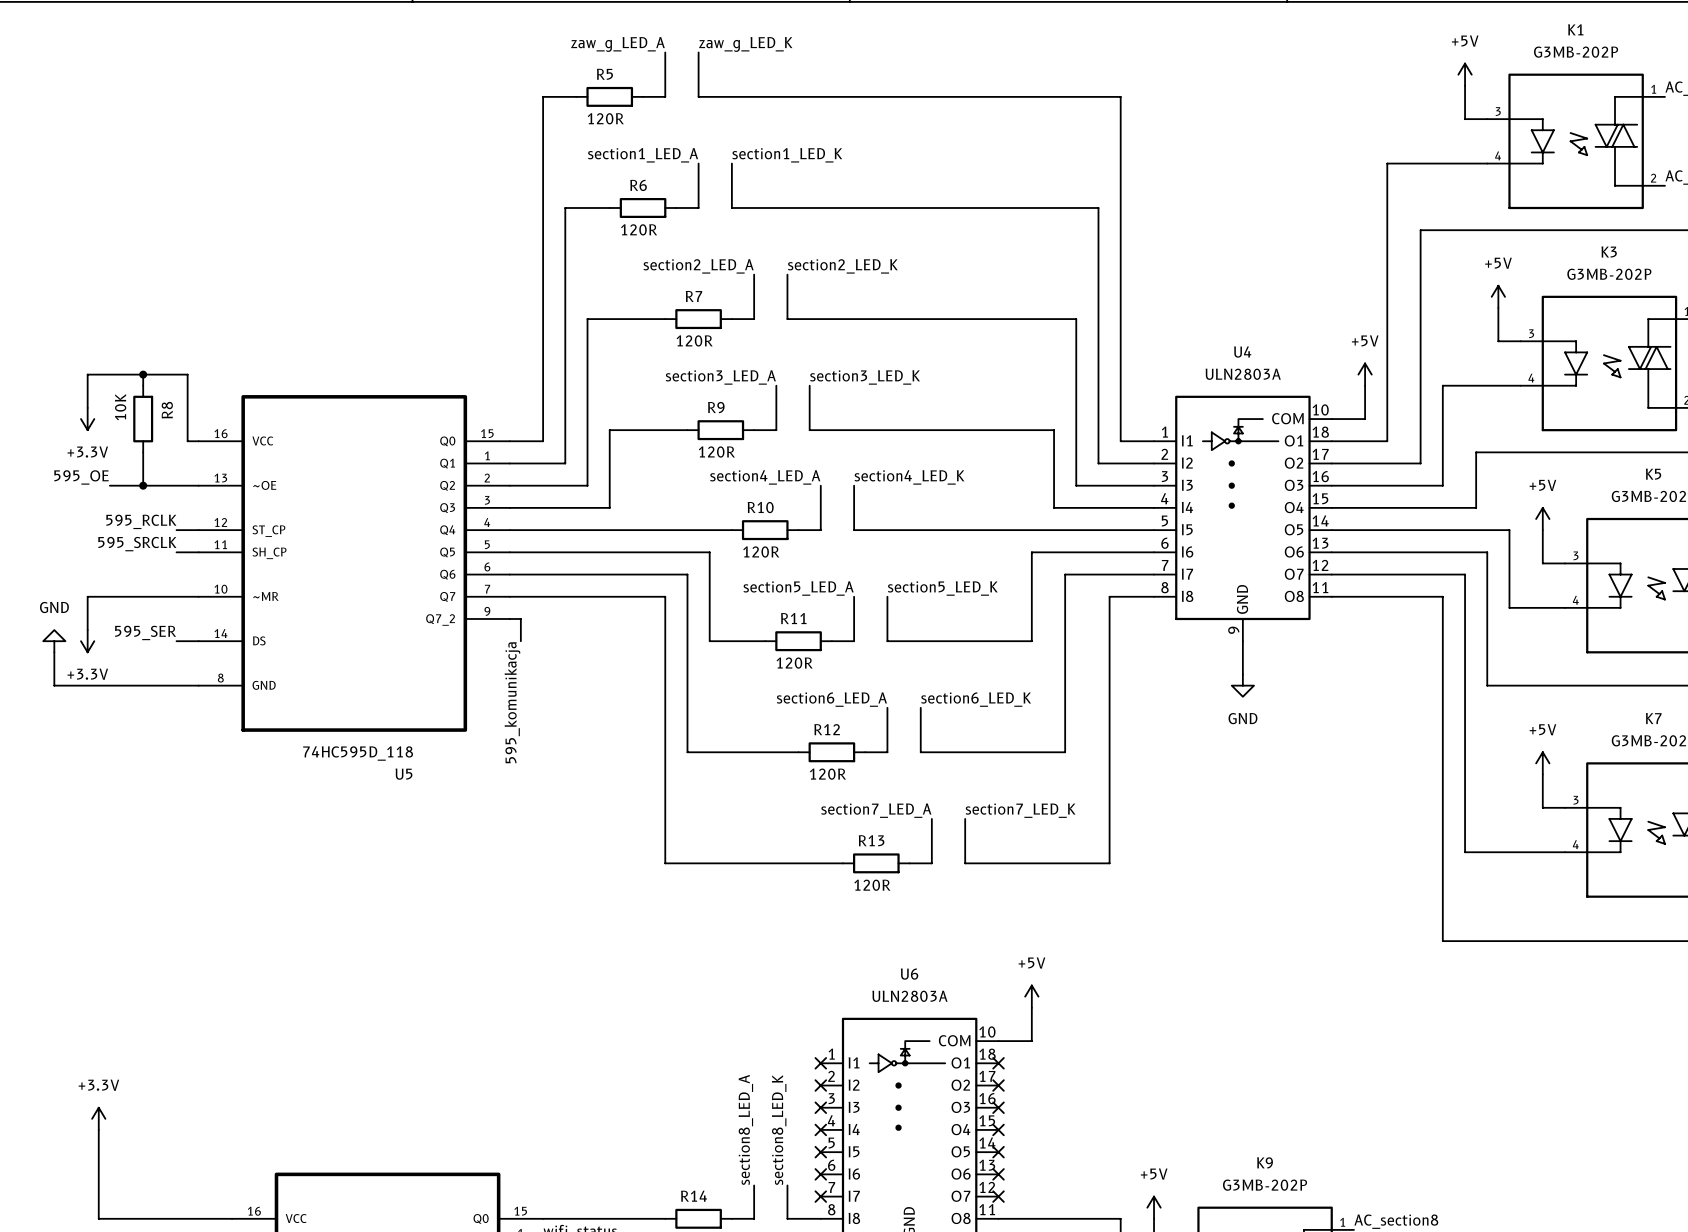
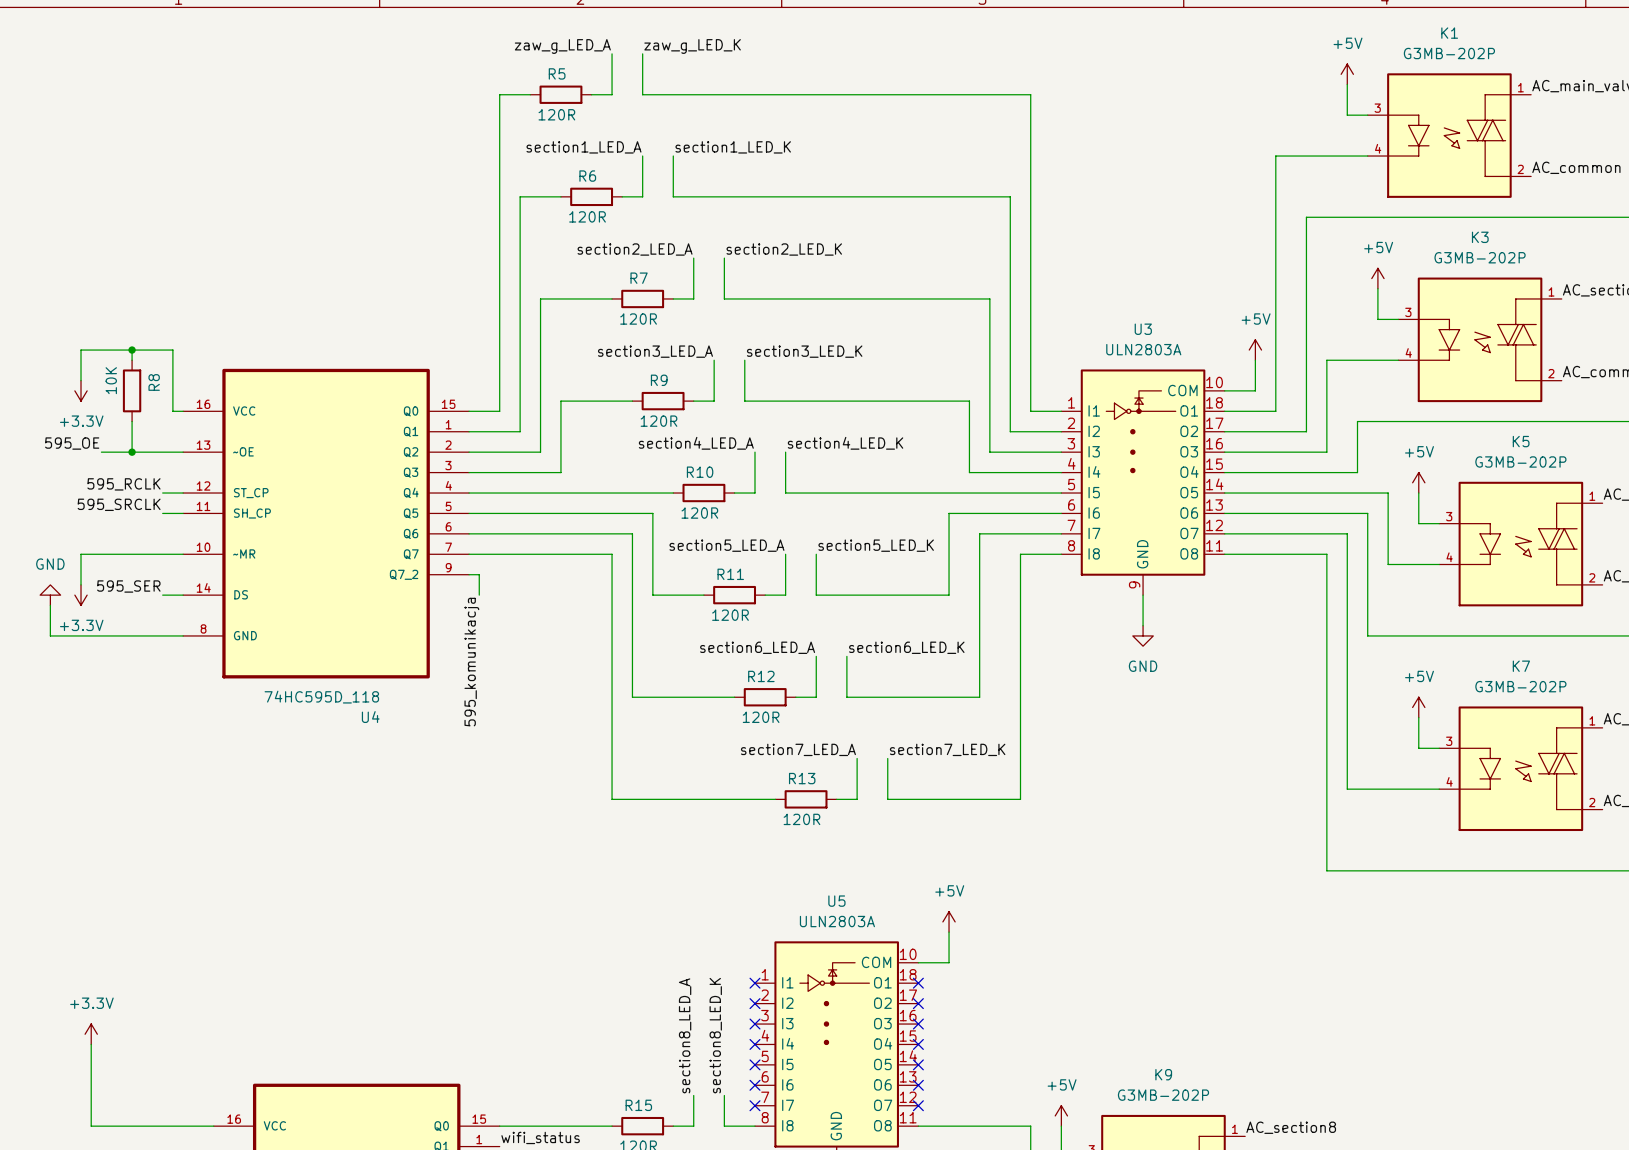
U4 name: U4 (1242, 352) -> U3 (1143, 329)
U5 name: U5 (403, 774) -> U4 (370, 717)
U6 name: U6 (909, 974) -> U5 (836, 901)
R14 name: R14 (693, 1196) -> R15 (638, 1105)

